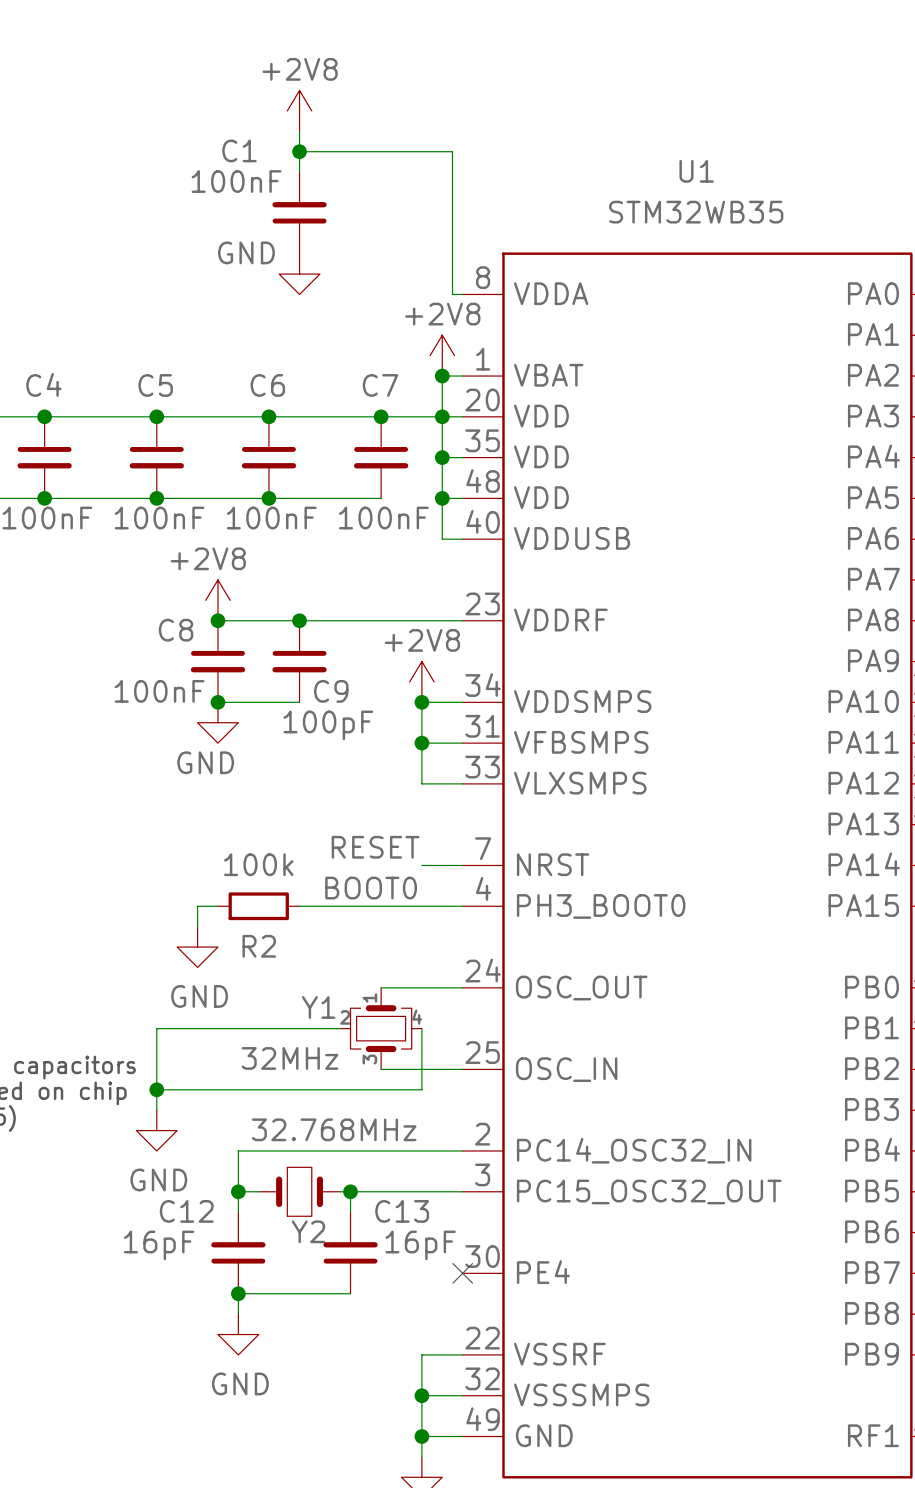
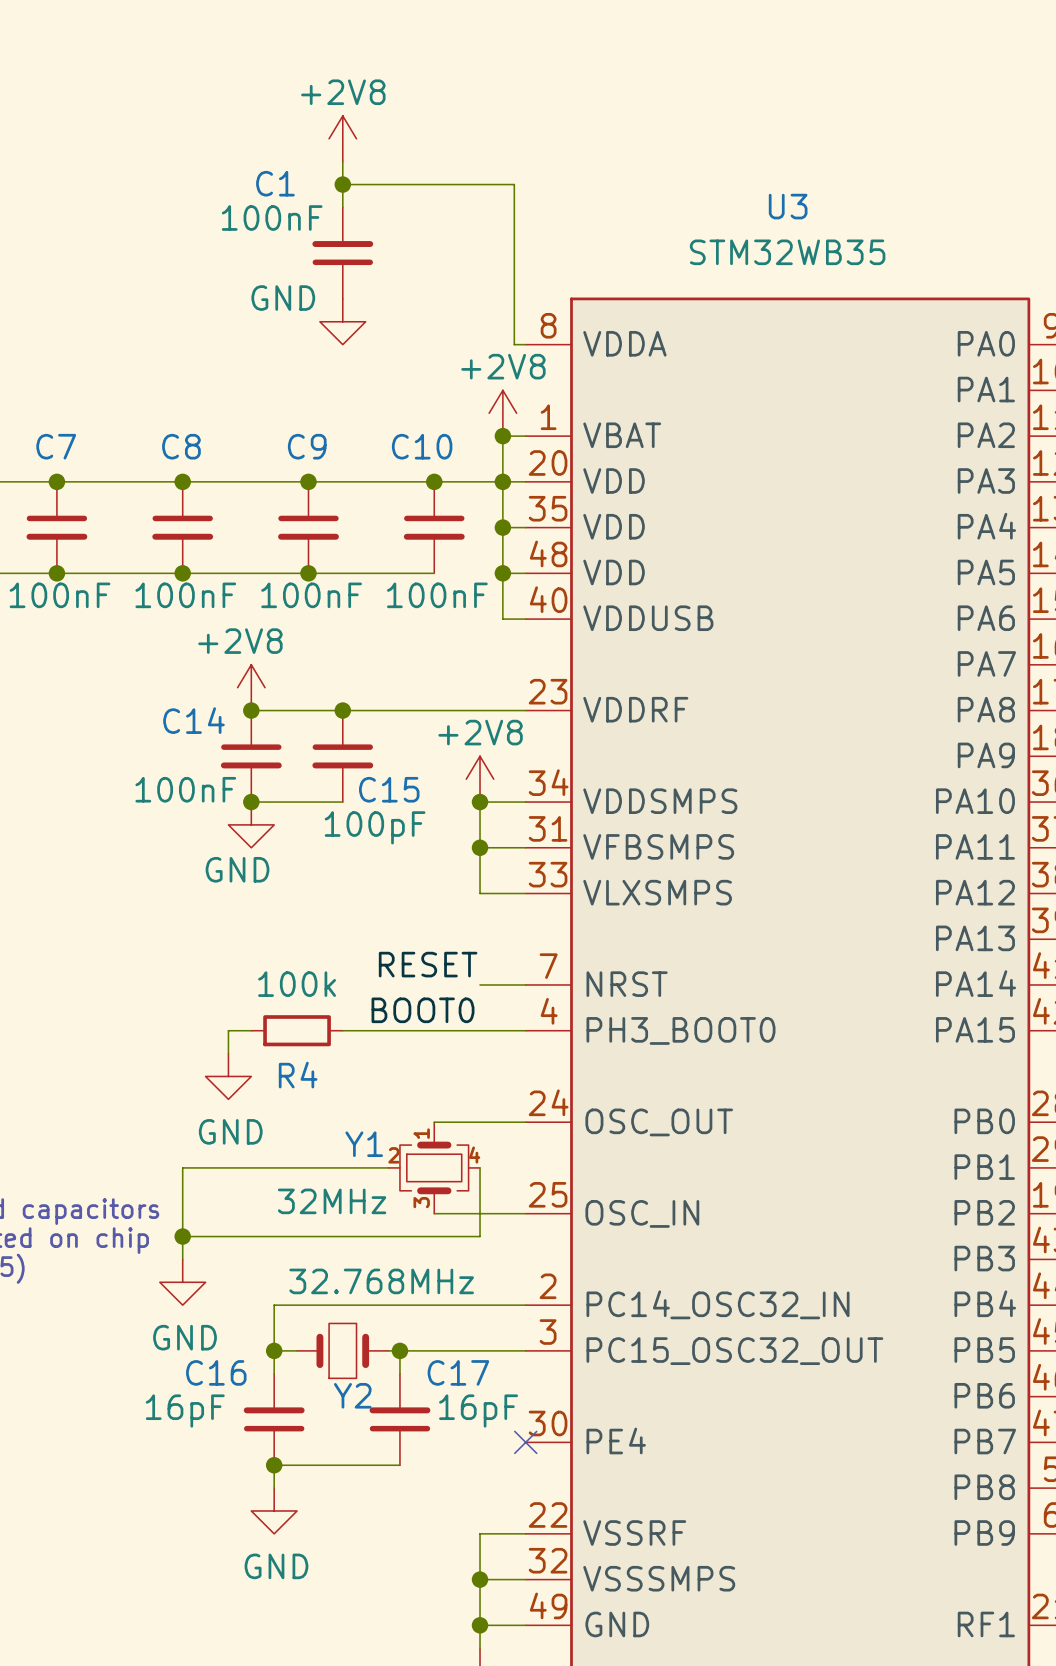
U1 name: U1 (696, 171) -> U3 (788, 206)
C4 name: C4 (43, 384) -> C7 (56, 446)
C5 name: C5 (155, 385) -> C8 (181, 446)
C6 name: C6 (267, 385) -> C9 (307, 446)
C7 name: C7 (380, 385) -> C10 (422, 446)
C8 name: C8 (176, 630) -> C14 (193, 720)
C9 name: C9 (331, 691) -> C15 (389, 789)
R2 name: R2 (259, 946) -> R4 (298, 1075)
C12 name: C12 (186, 1211) -> C16 (216, 1372)
C13 name: C13 (402, 1211) -> C17 (458, 1372)

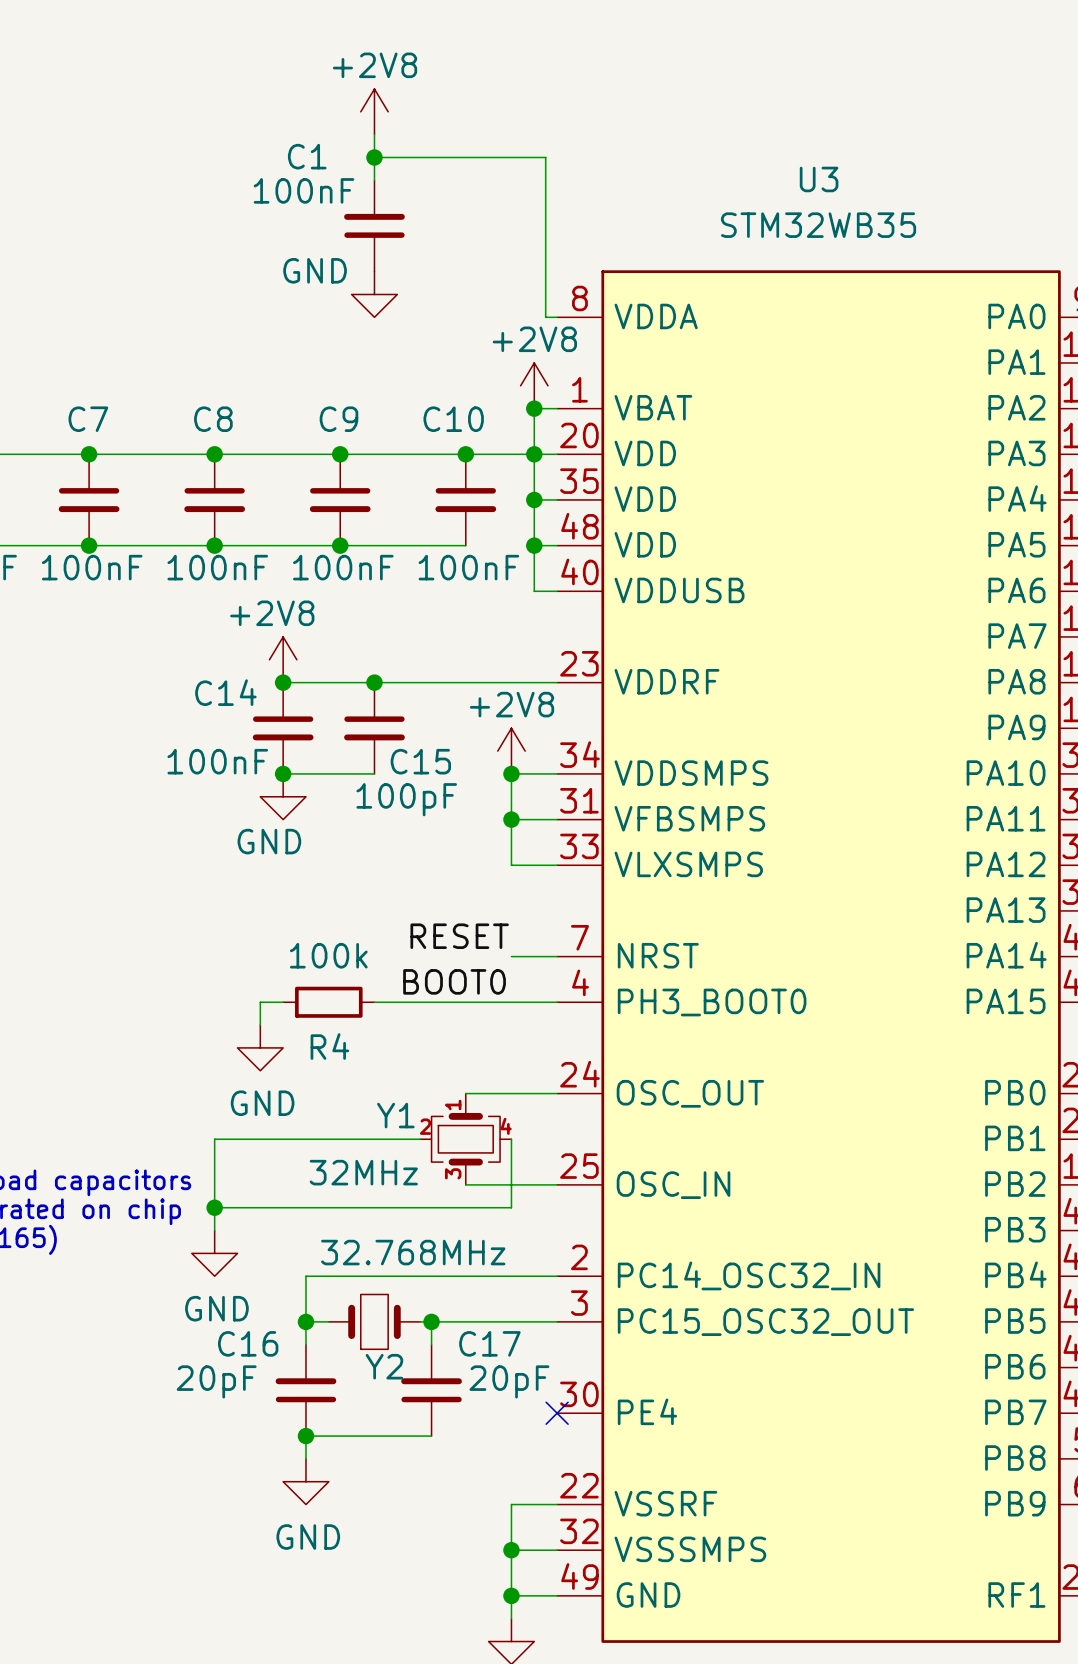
C16 value: 16pF (185, 1411) -> 20pF (216, 1381)
C17 value: 16pF (478, 1411) -> 20pF (509, 1381)

